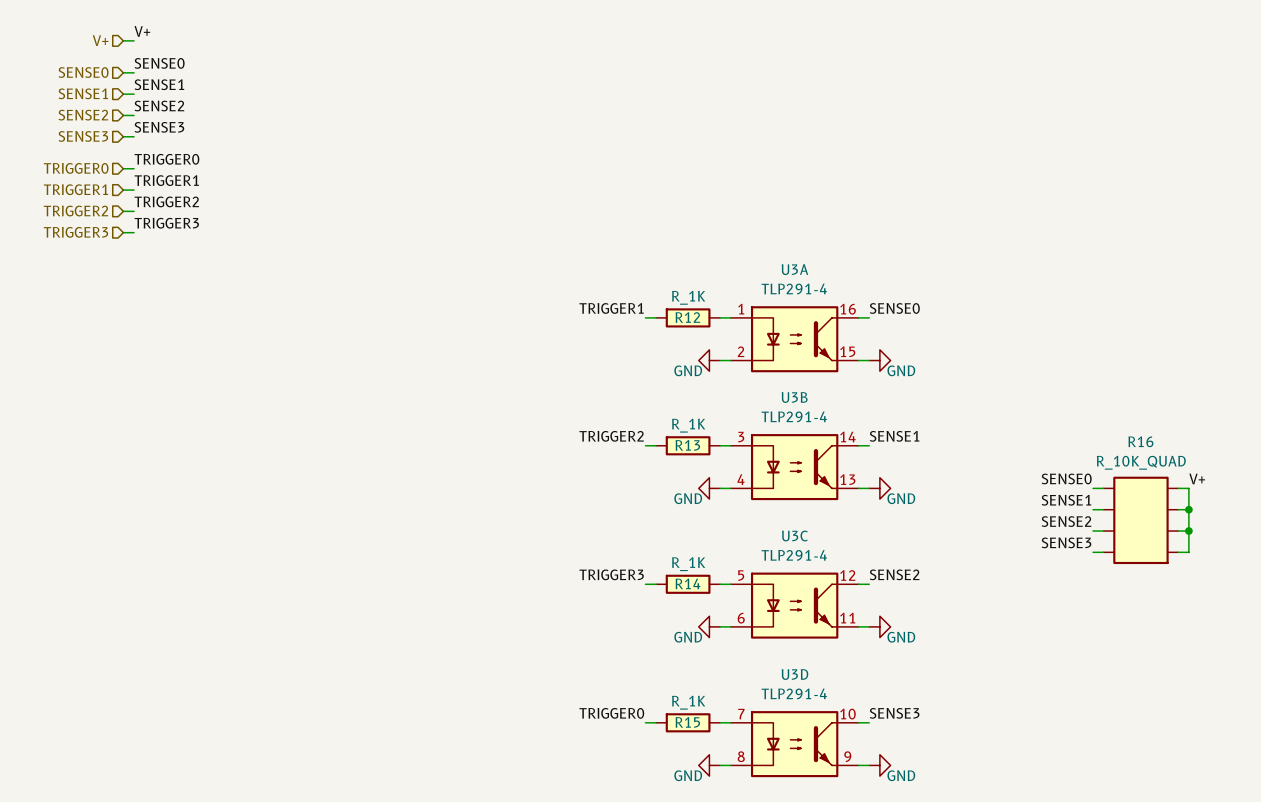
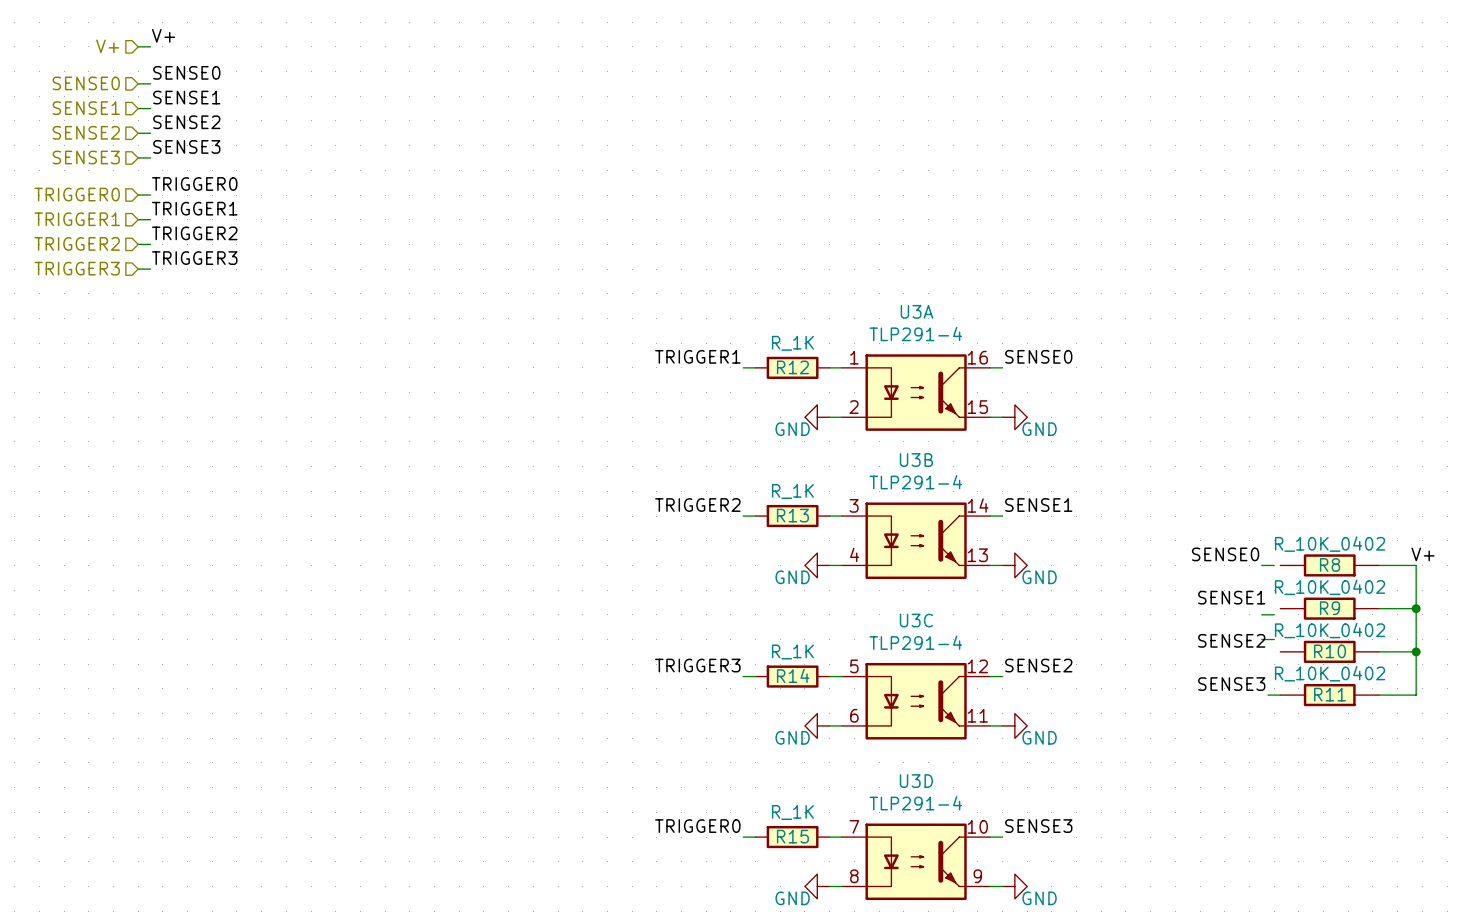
label position: V+ (1197, 478) -> V+ (1423, 554)
R8: none -> R_10K_0402 (1329, 565)
wire: (1178, 488) (1188, 488) (1188, 552) (1178, 552) -> none
wire: none -> (1379, 565) (1416, 565) (1416, 695) (1379, 695)
label position: SENSE1 (1066, 500) -> SENSE1 (1231, 597)
wire: (1093, 509) (1103, 509) -> (1267, 695) (1280, 695)
wire: (1178, 509) (1188, 509) -> none
junction: (1188, 509) -> none
R16: R_10K_QUAD (1140, 520) -> none
label position: SENSE2 (1066, 521) -> SENSE2 (1231, 640)
R9: none -> R_10K_0402 (1329, 608)
wire: none -> (1379, 608) (1416, 608)
junction: none -> (1416, 608)
wire: (1178, 531) (1188, 531) -> none
junction: (1188, 531) -> none
label position: SENSE3 (1066, 542) -> SENSE3 (1231, 684)
R10: none -> R_10K_0402 (1329, 651)
wire: none -> (1379, 651) (1416, 651)
junction: none -> (1416, 651)
R11: none -> R_10K_0402 (1329, 695)

